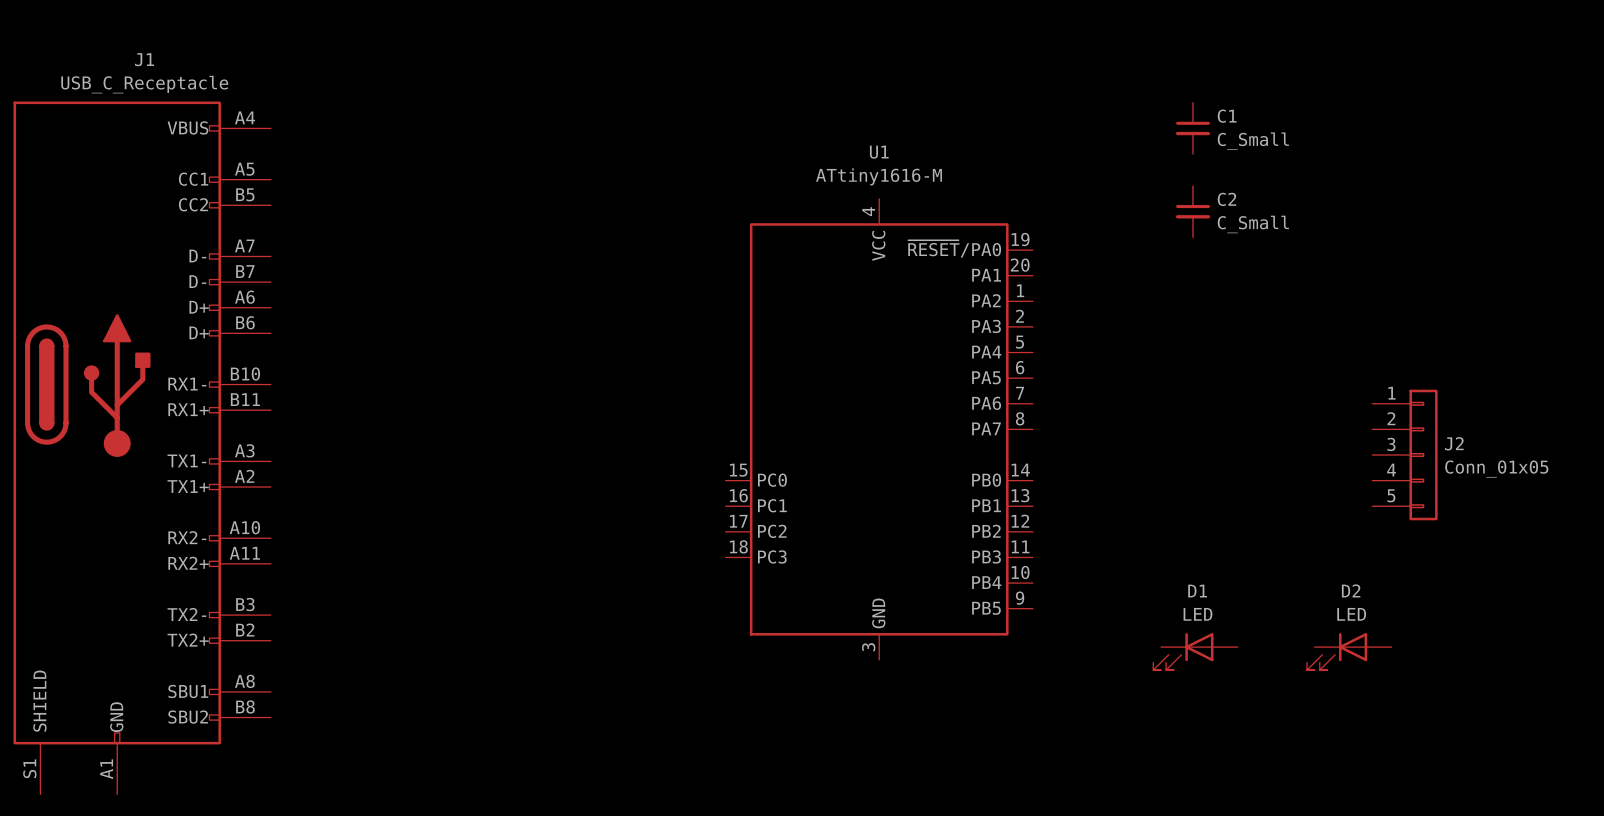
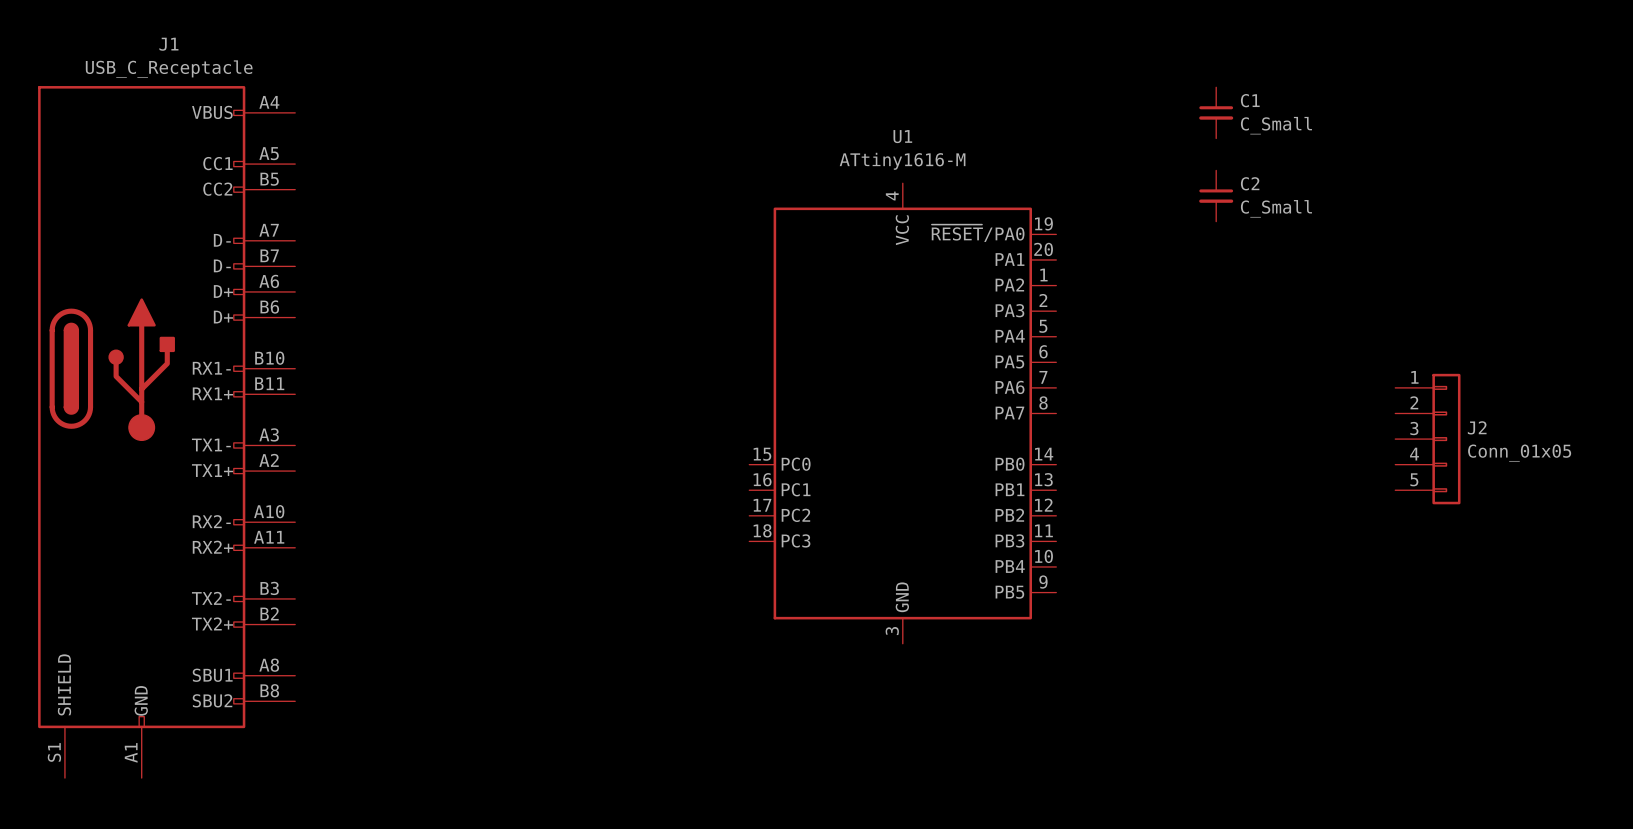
D1: LED (1195, 651) -> none
D2: LED (1349, 651) -> none

